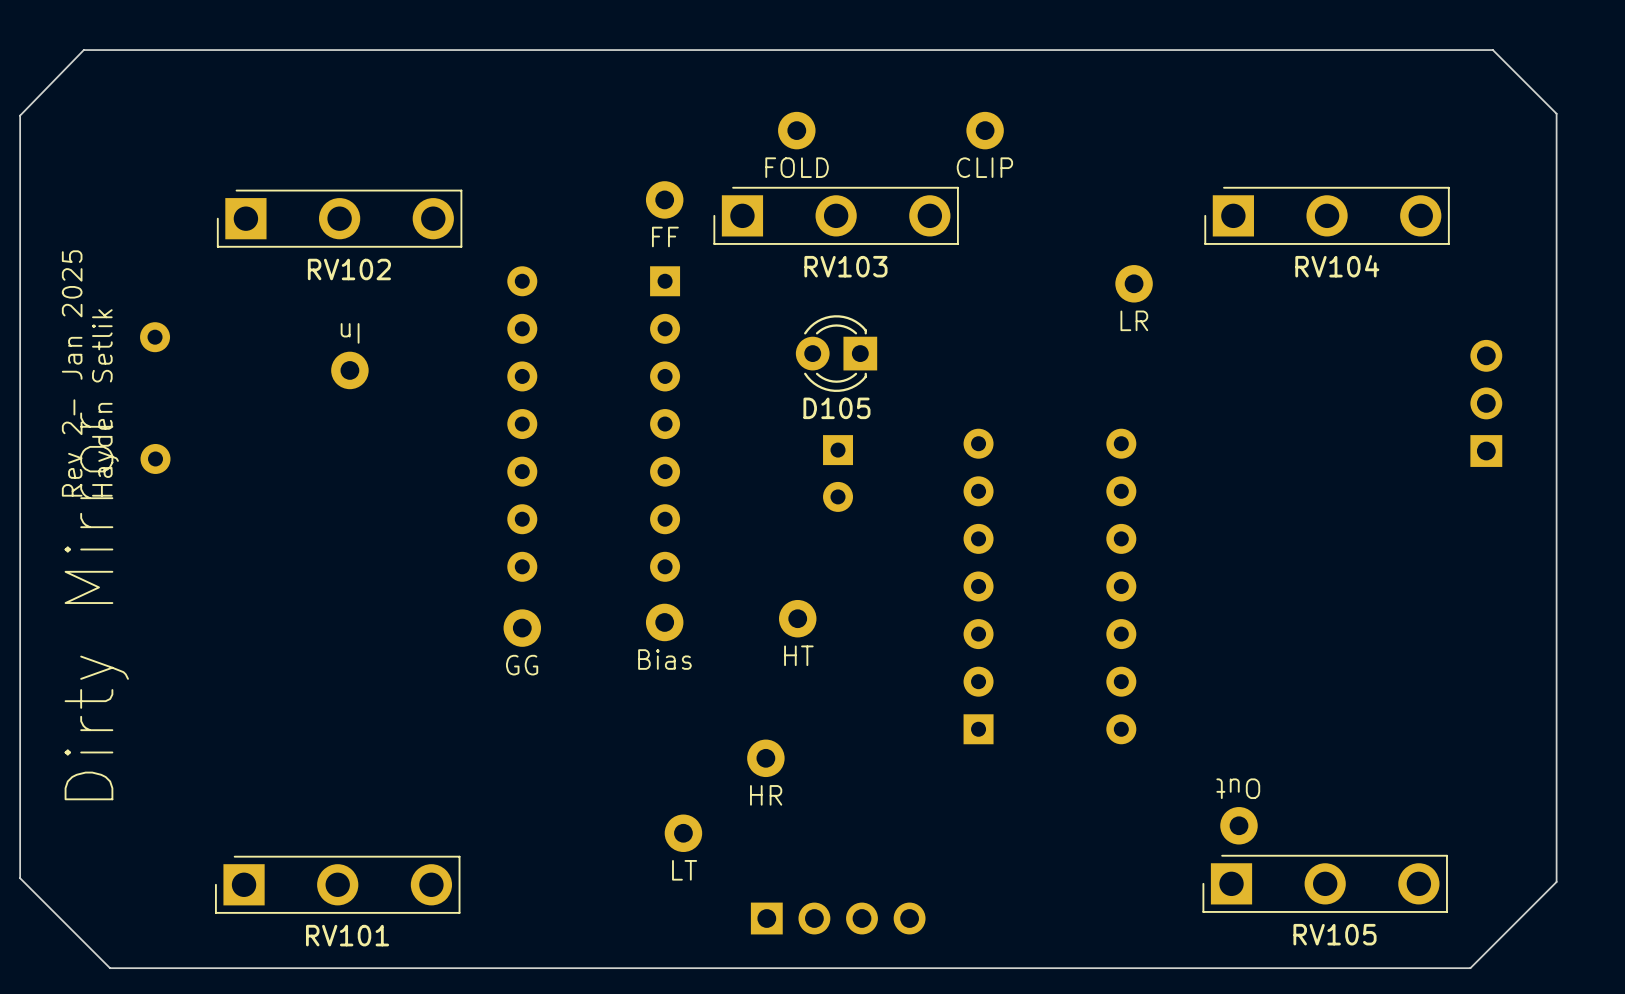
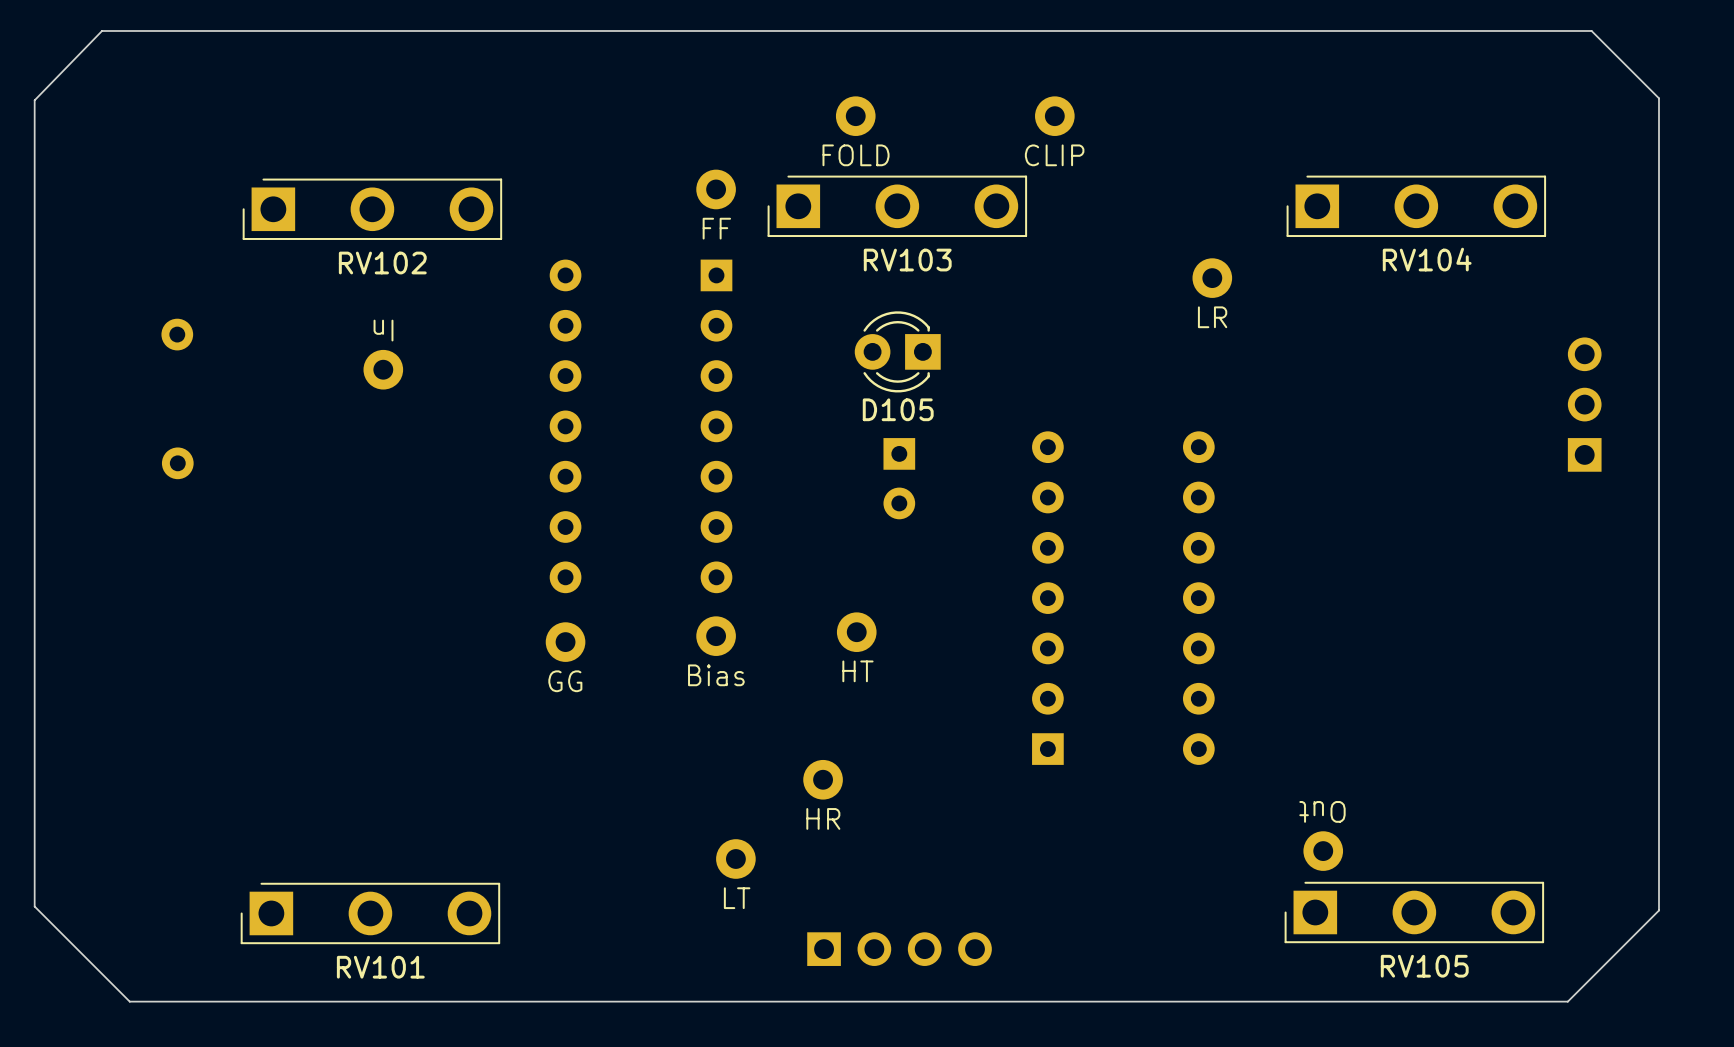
text: Rev 2- Jan 2025 (72, 373) -> none
text: Hayden Setlik (105, 402) -> none
text: Dirty Mirror (96, 606) -> none

